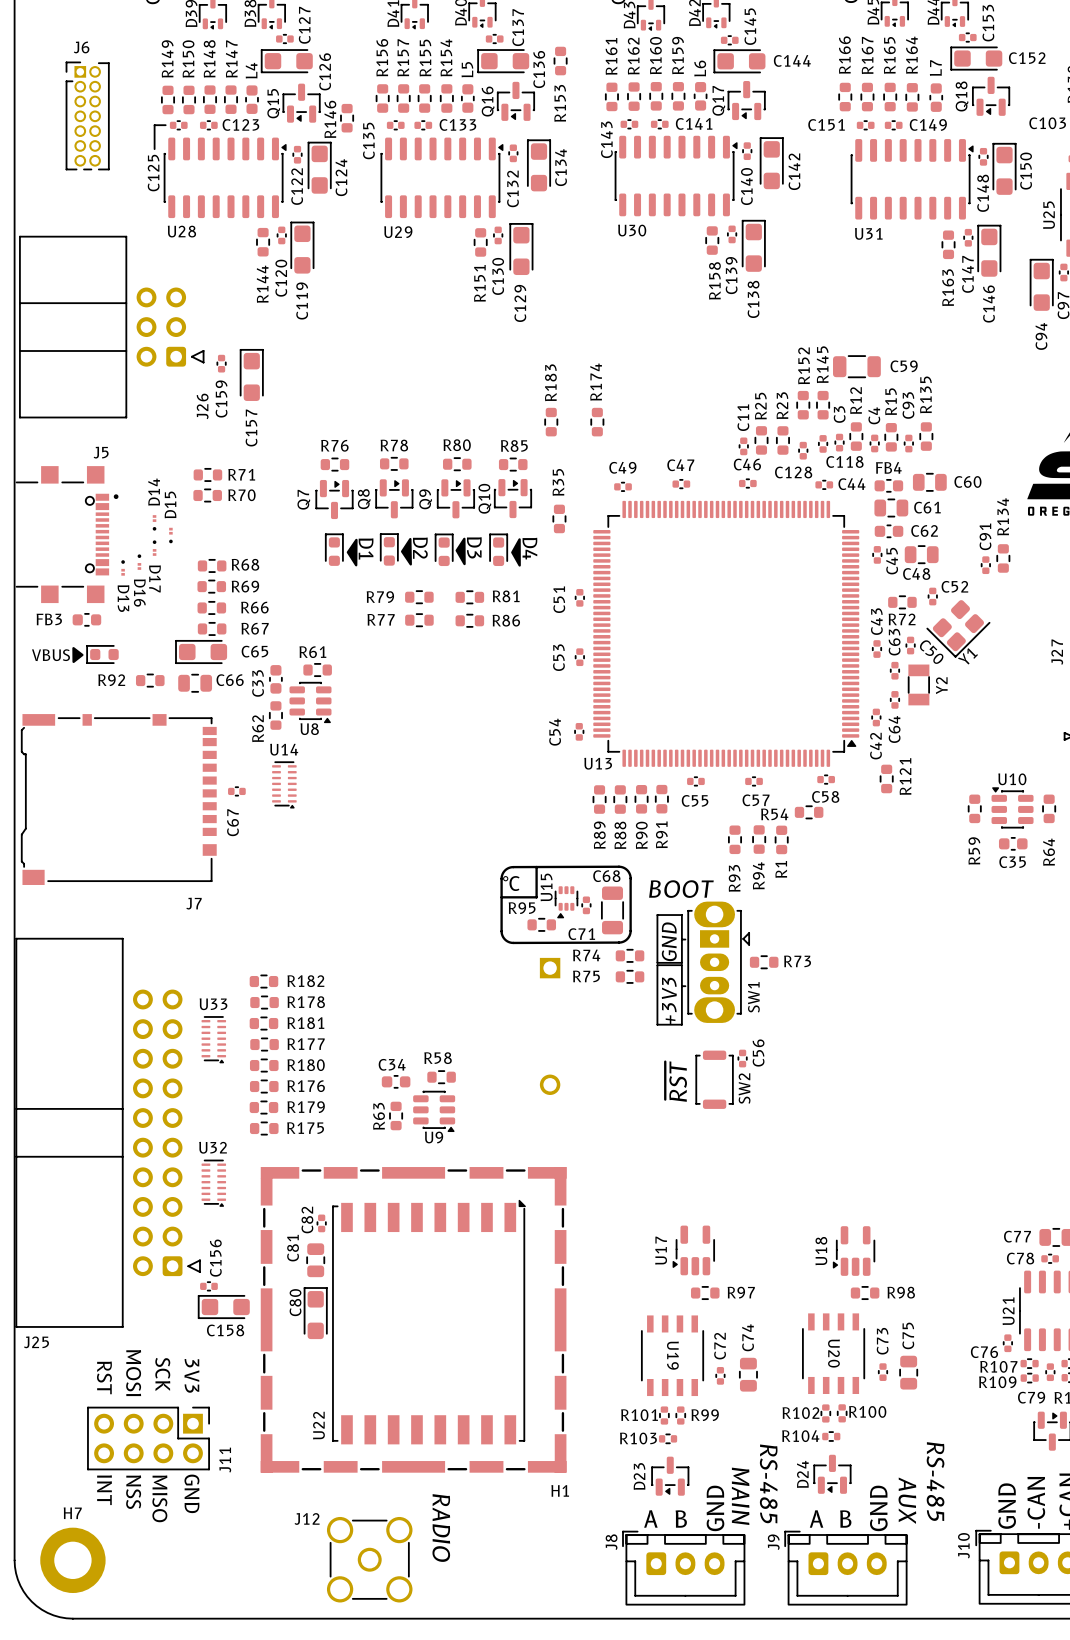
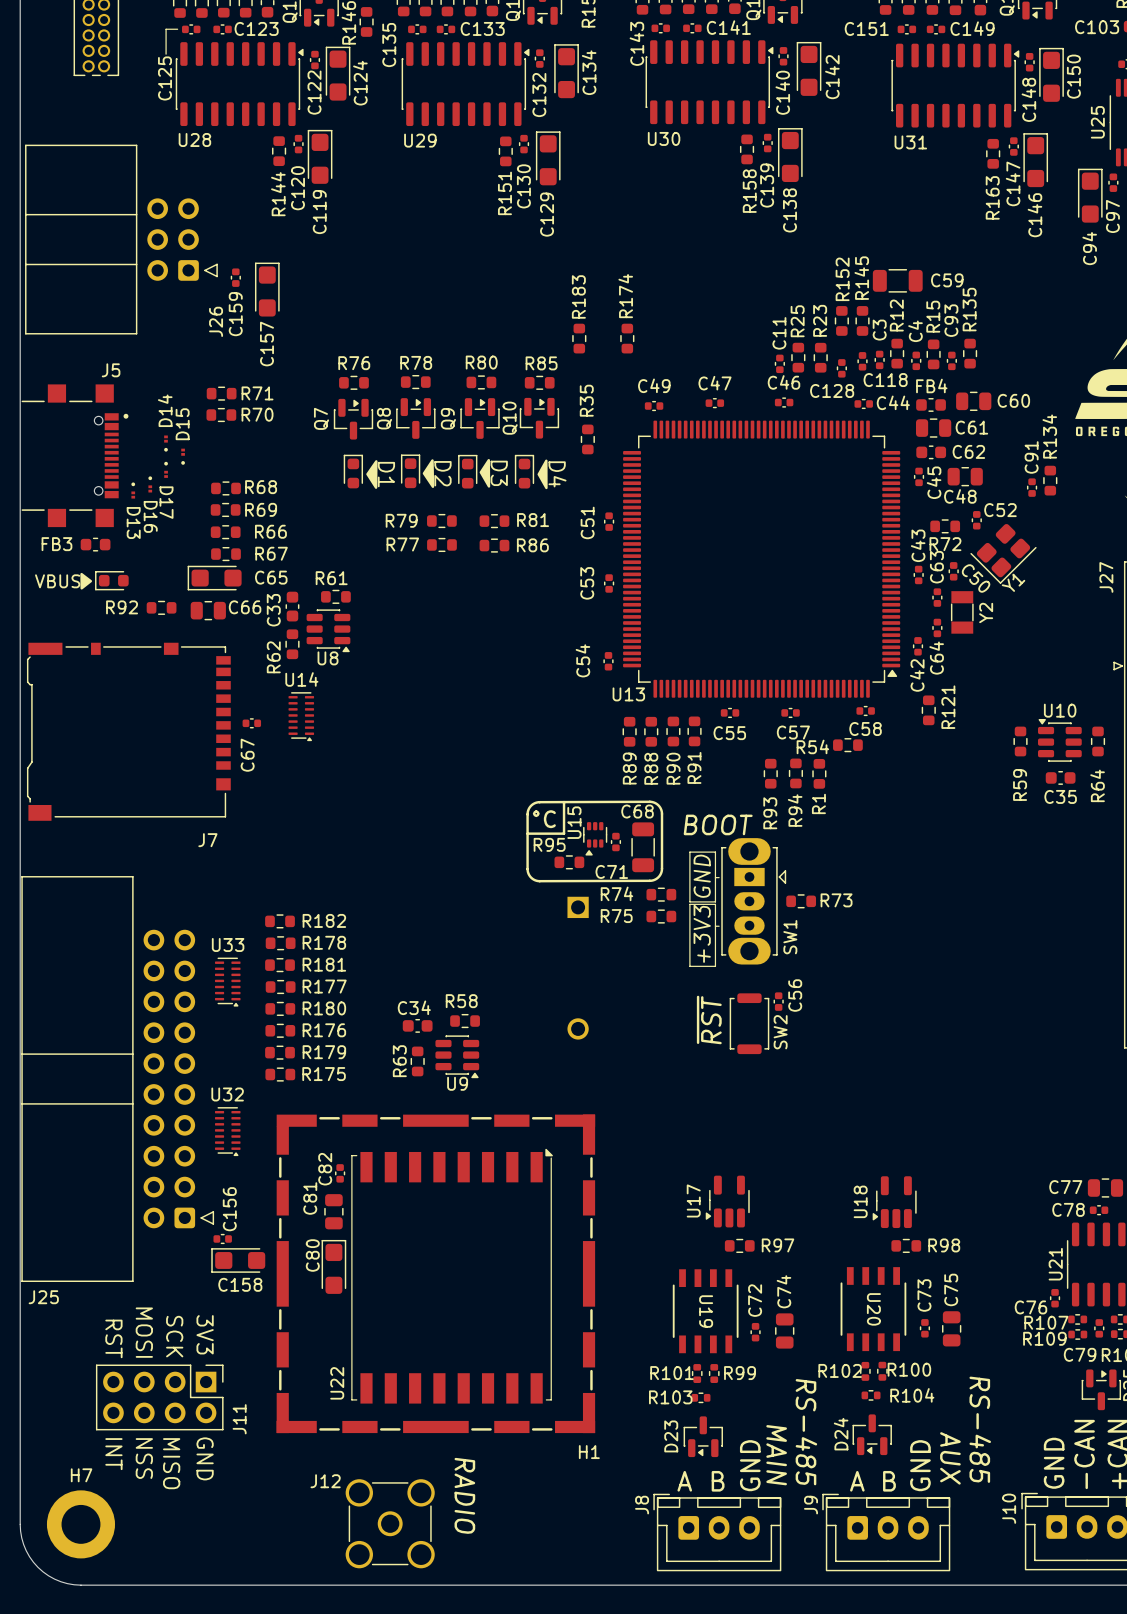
R104 name position: R104 (800, 1436) -> R104 (912, 1395)

